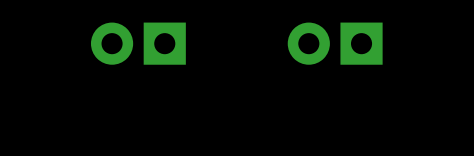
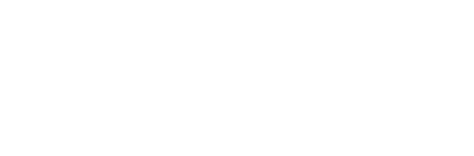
part: (138, 43) -> none
part: (335, 43) -> none

